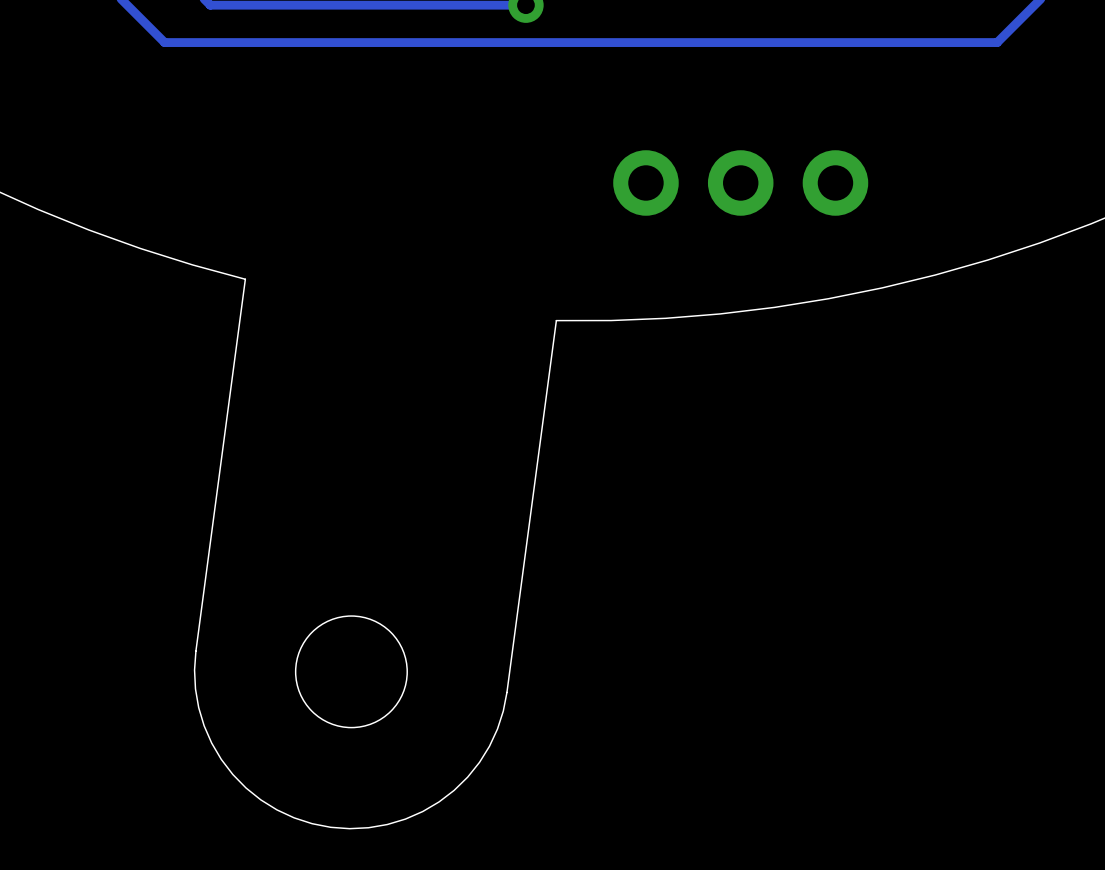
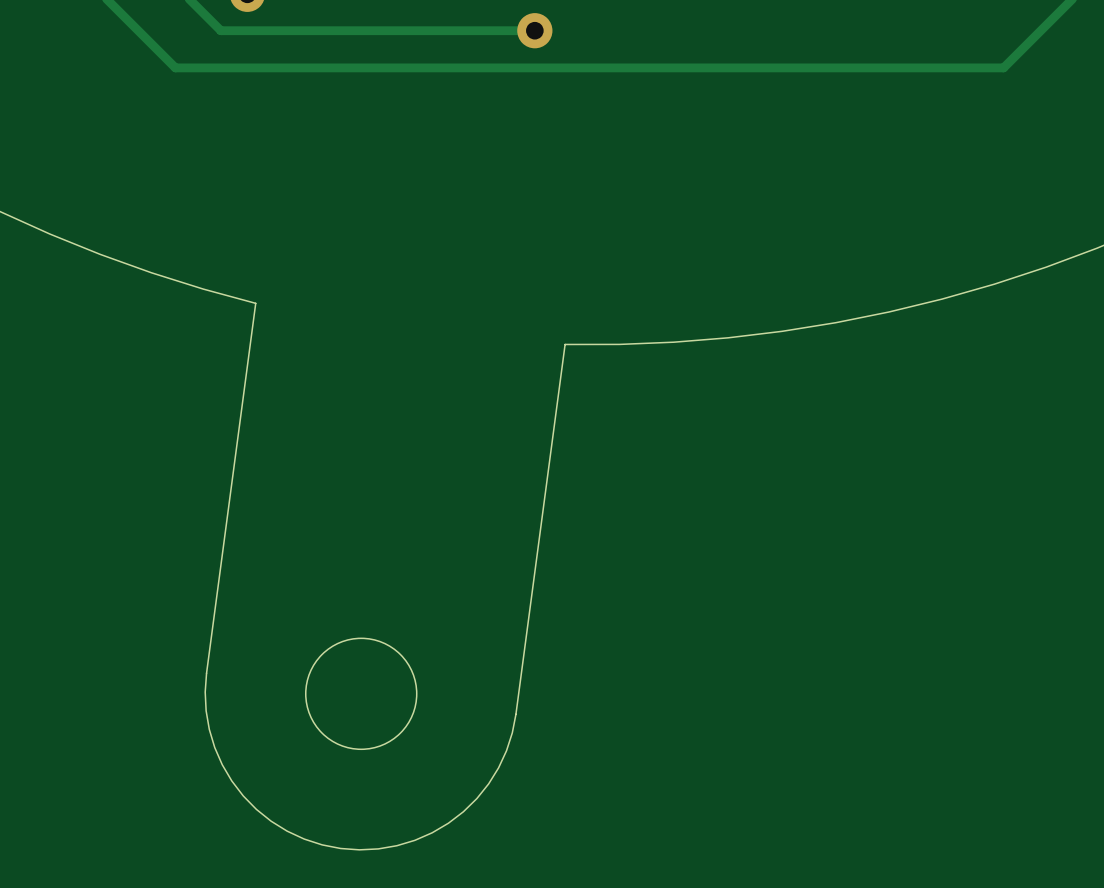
part: (740, 182) -> none

